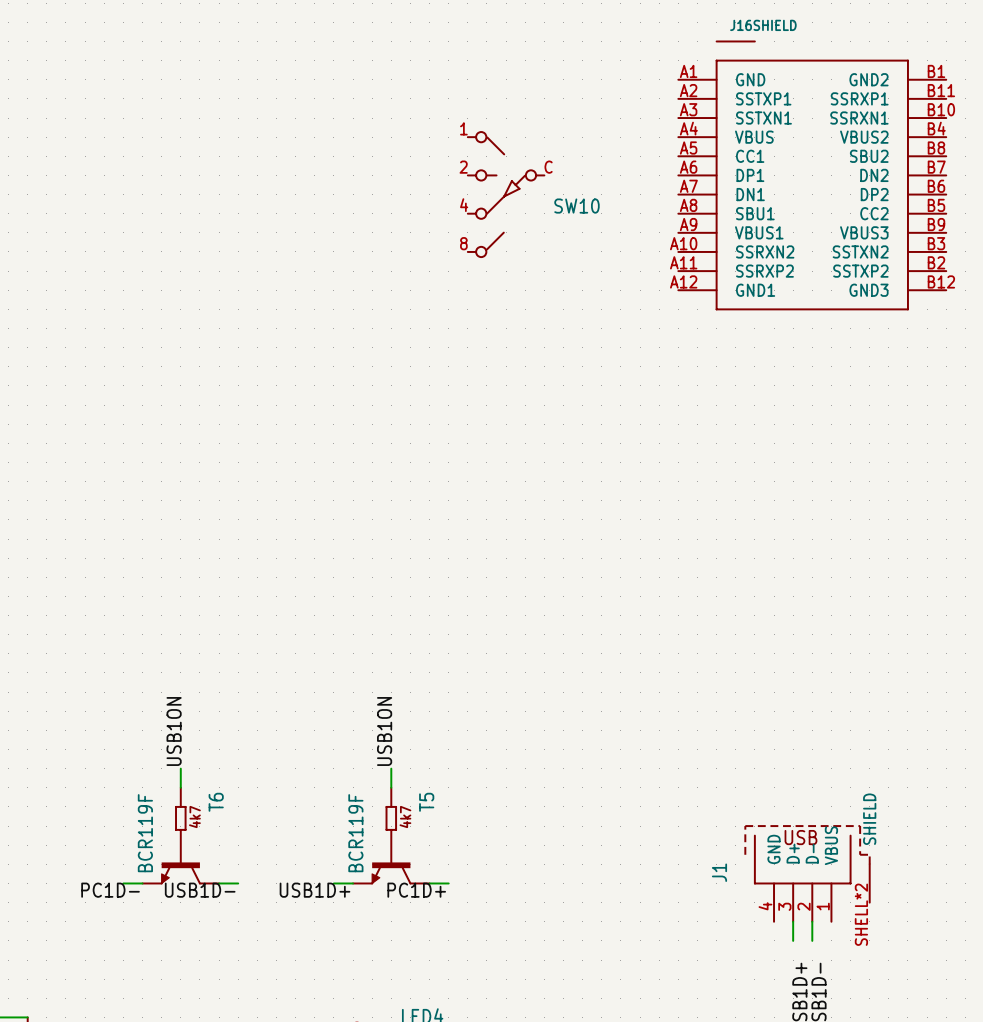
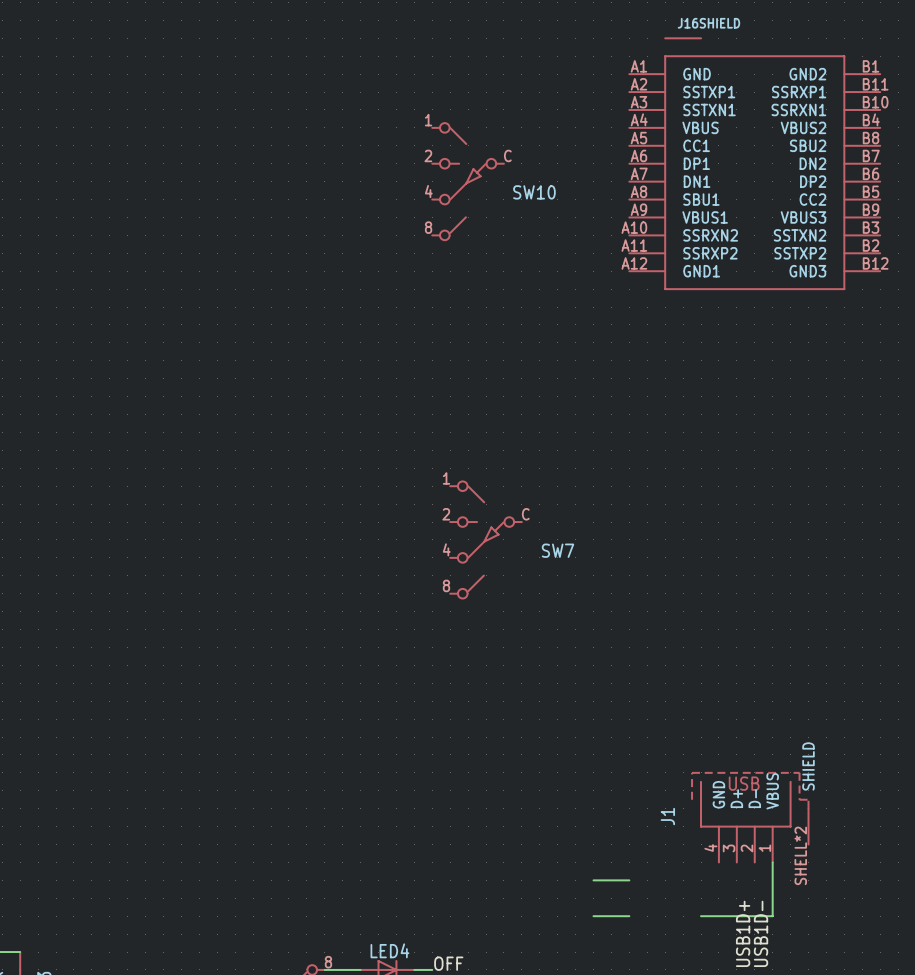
SW7: none -> (486, 539)
label: USB1ON (174, 731) -> none
label: USB1ON (384, 731) -> none
wire: (180, 768) (180, 787) -> none
wire: (391, 768) (391, 787) -> none
T6: BCR119F (180, 835) -> none
T5: BCR119F (391, 835) -> none
wire: (123, 883) (142, 883) -> none
wire: (219, 883) (238, 883) -> none
wire: (333, 883) (353, 883) -> none
wire: (429, 883) (448, 883) -> none
label: PC1D- (110, 890) -> none
label: USB1D- (200, 890) -> none
label: USB1D+ (315, 890) -> none
label: PC1D+ (416, 890) -> none
wire: (793, 921) (793, 940) -> none
wire: (812, 921) (812, 940) -> none
wire: none -> (772, 862) (772, 916) (701, 916)
wire: none -> (593, 880) (629, 880)
wire: none -> (593, 916) (629, 916)

